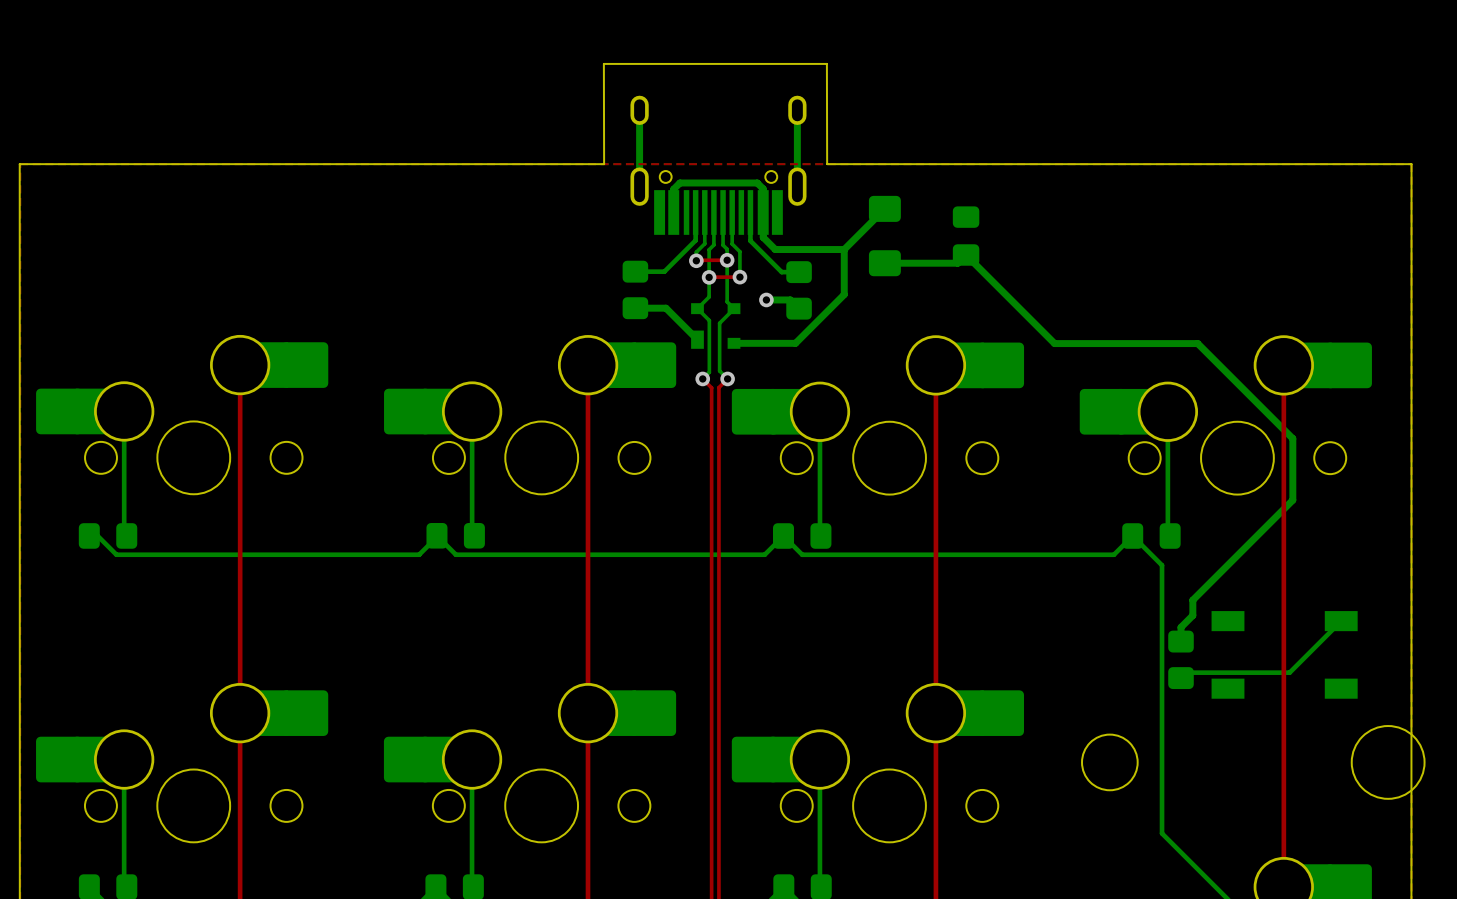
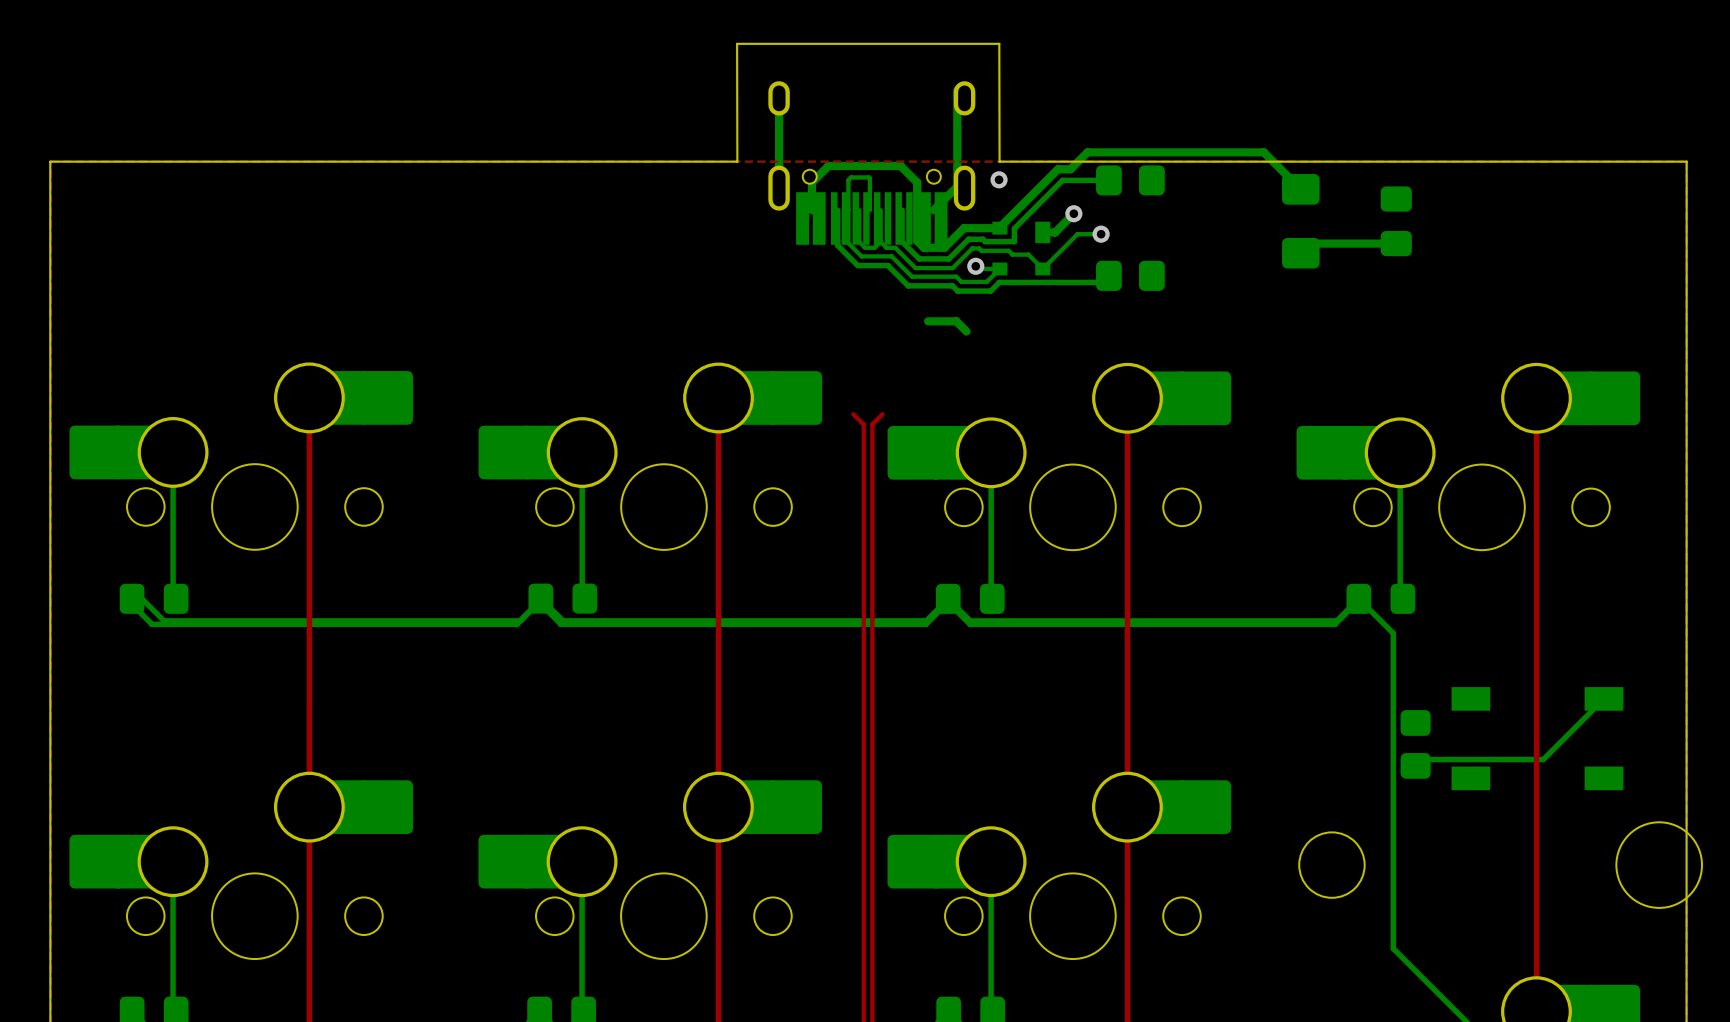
bottom track: none -> (957, 90) (957, 186) (933, 210)
bottom track: (797, 110) (797, 186) -> none
via: none -> (999, 179)
bottom track: none -> (1108, 180) (1062, 180) (1014, 228) (1014, 241) (968, 239) (948, 258) (919, 258) (902, 241) (902, 210)
part: none -> (1130, 180)
bottom track: none -> (1300, 189) (1263, 152) (1087, 152) (1070, 169) (1057, 169) (999, 228) (963, 228) (944, 247) (923, 247) (917, 241) (917, 182) (900, 166) (828, 166) (811, 182) (811, 210)
bottom track: none -> (837, 210) (837, 245) (857, 265) (887, 265) (908, 285) (952, 285) (957, 291) (990, 291) (999, 282) (1102, 282) (1108, 275)
bottom track: none -> (859, 210) (859, 241) (865, 247) (874, 247) (880, 241)
bottom track: none -> (869, 210) (869, 178) (851, 177) (848, 180) (848, 243) (861, 256) (891, 256) (912, 276) (956, 276) (961, 281) (986, 281) (999, 268) (978, 268) (975, 266)
bottom track: none -> (880, 210) (880, 241)
bottom track: (884, 208) (844, 249) -> none
bottom track: none -> (1073, 213) (1055, 232) (1042, 232)
via: none -> (1073, 213)
bottom track: (673, 212) (673, 189) (679, 182) (757, 182) (763, 188) (763, 237) (775, 249) (844, 249) -> none
bottom track: (695, 212) (695, 240) (664, 271) (635, 271) -> none
bottom track: (704, 212) (704, 243) (696, 252) (696, 260) -> none
bottom track: (713, 212) (713, 244) (709, 249) (709, 297) (697, 308) (709, 320) (709, 372) (702, 378) -> none
bottom track: (723, 212) (723, 245) (727, 249) (727, 301) (734, 308) -> none
bottom track: (732, 212) (732, 243) (739, 251) (739, 277) -> none
bottom track: (750, 212) (750, 240) (781, 272) (799, 272) -> none
bottom track: none -> (1101, 234) (1077, 234) (1042, 268) (1028, 254) (1012, 254) (1008, 250) (981, 250) (979, 248) (972, 248) (952, 268) (915, 268) (895, 247) (886, 247) (880, 241)
via: none -> (1101, 234)
bottom track: none -> (1396, 243) (1310, 243) (1300, 253)
part position: (884, 236) -> (1300, 221)
part position: (966, 236) -> (1396, 221)
bottom track: (844, 249) (844, 294) (795, 343) (734, 343) -> none
via: none -> (975, 266)
via: (696, 260) -> none
top track: (727, 260) (696, 260) -> none
via: (727, 260) -> none
part: none -> (1130, 275)
bottom track: (884, 263) (957, 263) (966, 255) (1054, 343) (1197, 343) (1292, 438) (1292, 500) (1192, 600) (1192, 615) (1181, 627) (1181, 641) -> none
top track: (709, 277) (739, 277) -> none
via: (709, 277) -> none
via: (739, 277) -> none
part: (635, 289) -> none
part: (799, 290) -> none
via: (766, 299) -> none
bottom track: (635, 308) (665, 308) (697, 339) -> none
bottom track: (734, 308) (719, 323) (719, 370) (727, 378) -> none
part rotation: 0° (715, 325) -> 180° (1021, 248)
part position: (715, 325) -> (1021, 248)
via: (702, 378) -> none
via: (727, 378) -> none
bottom track: none -> (129, 602) (152, 624) (516, 624) (539, 602) (561, 624) (926, 624) (948, 602) (970, 624) (1335, 624) (1357, 602)

